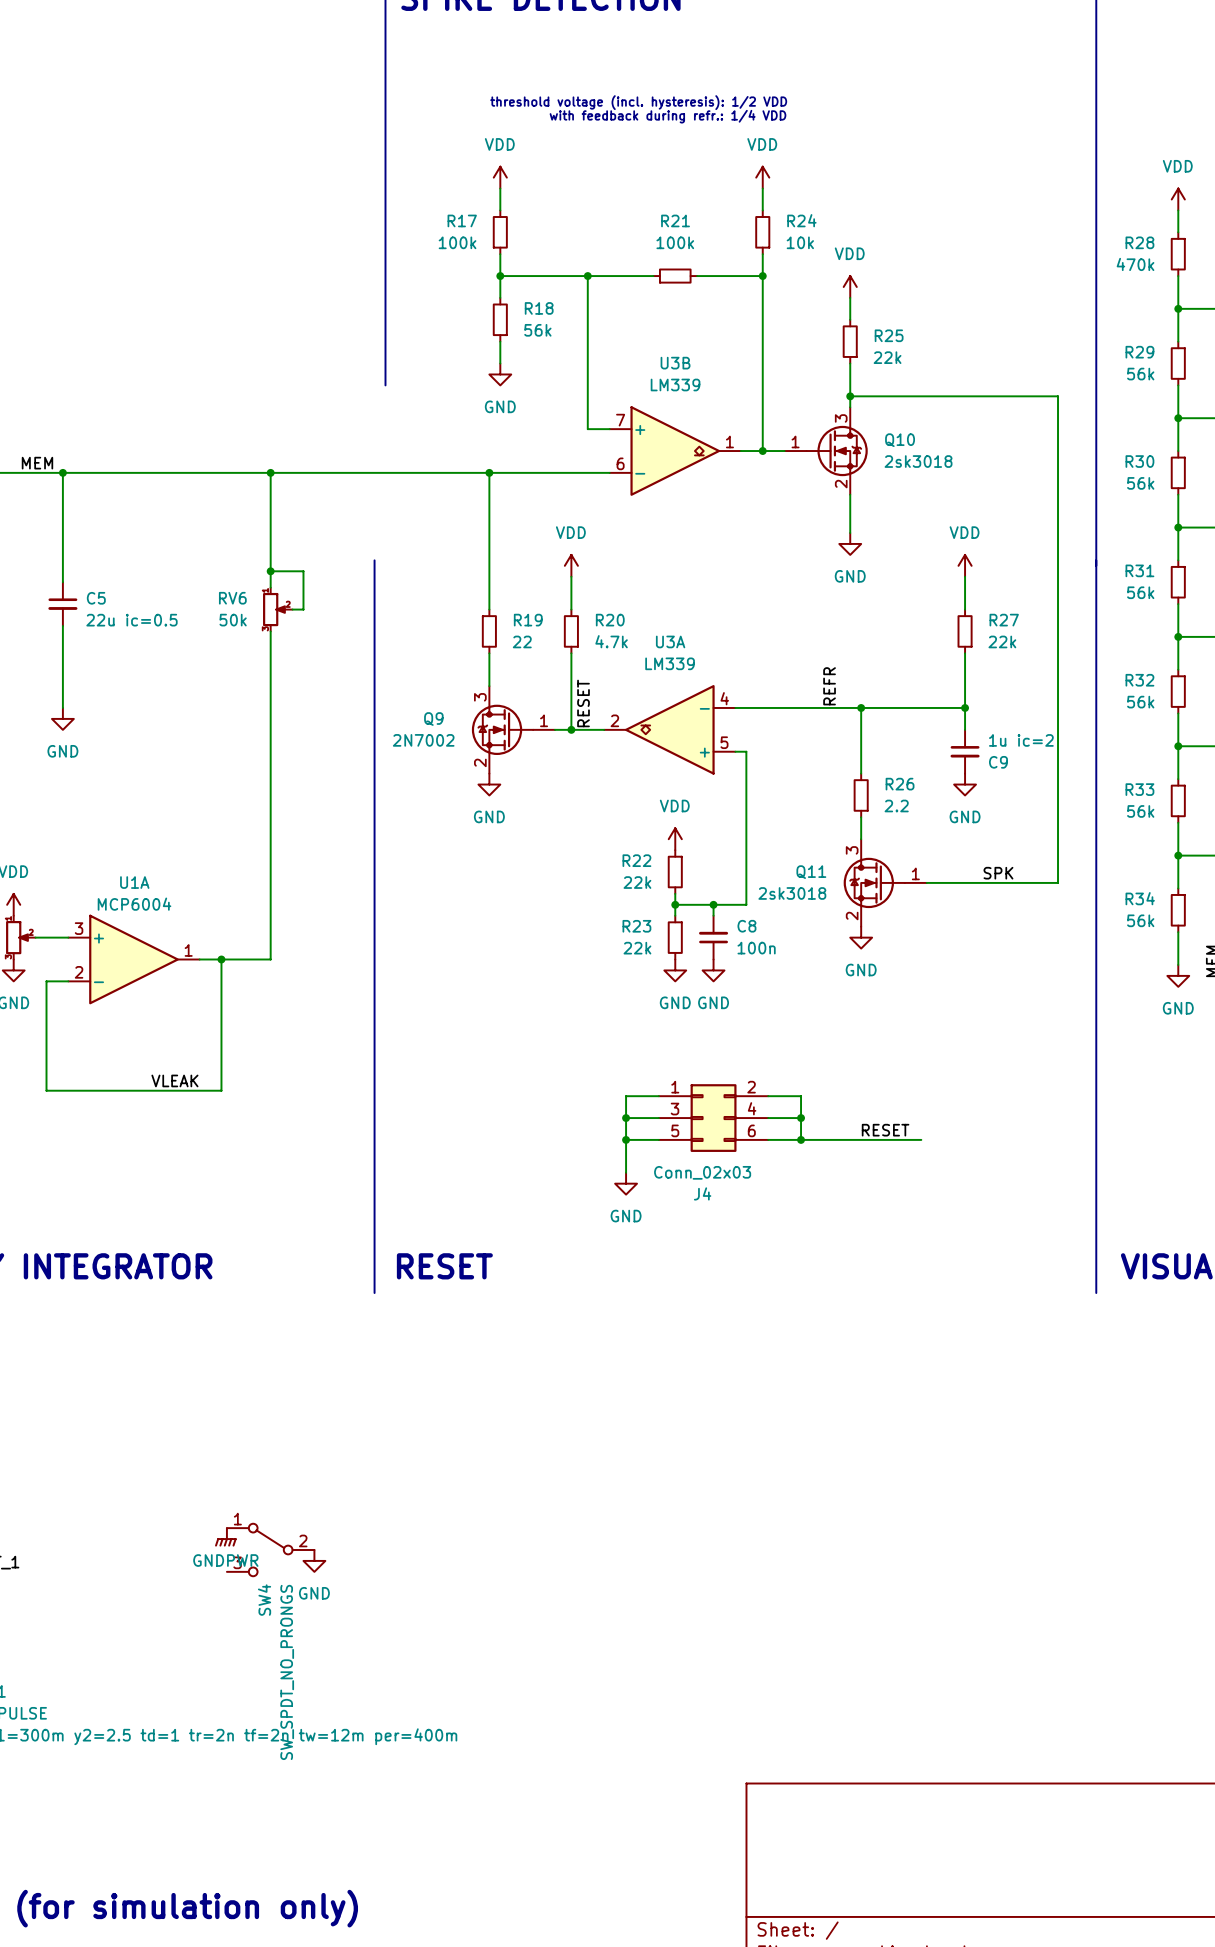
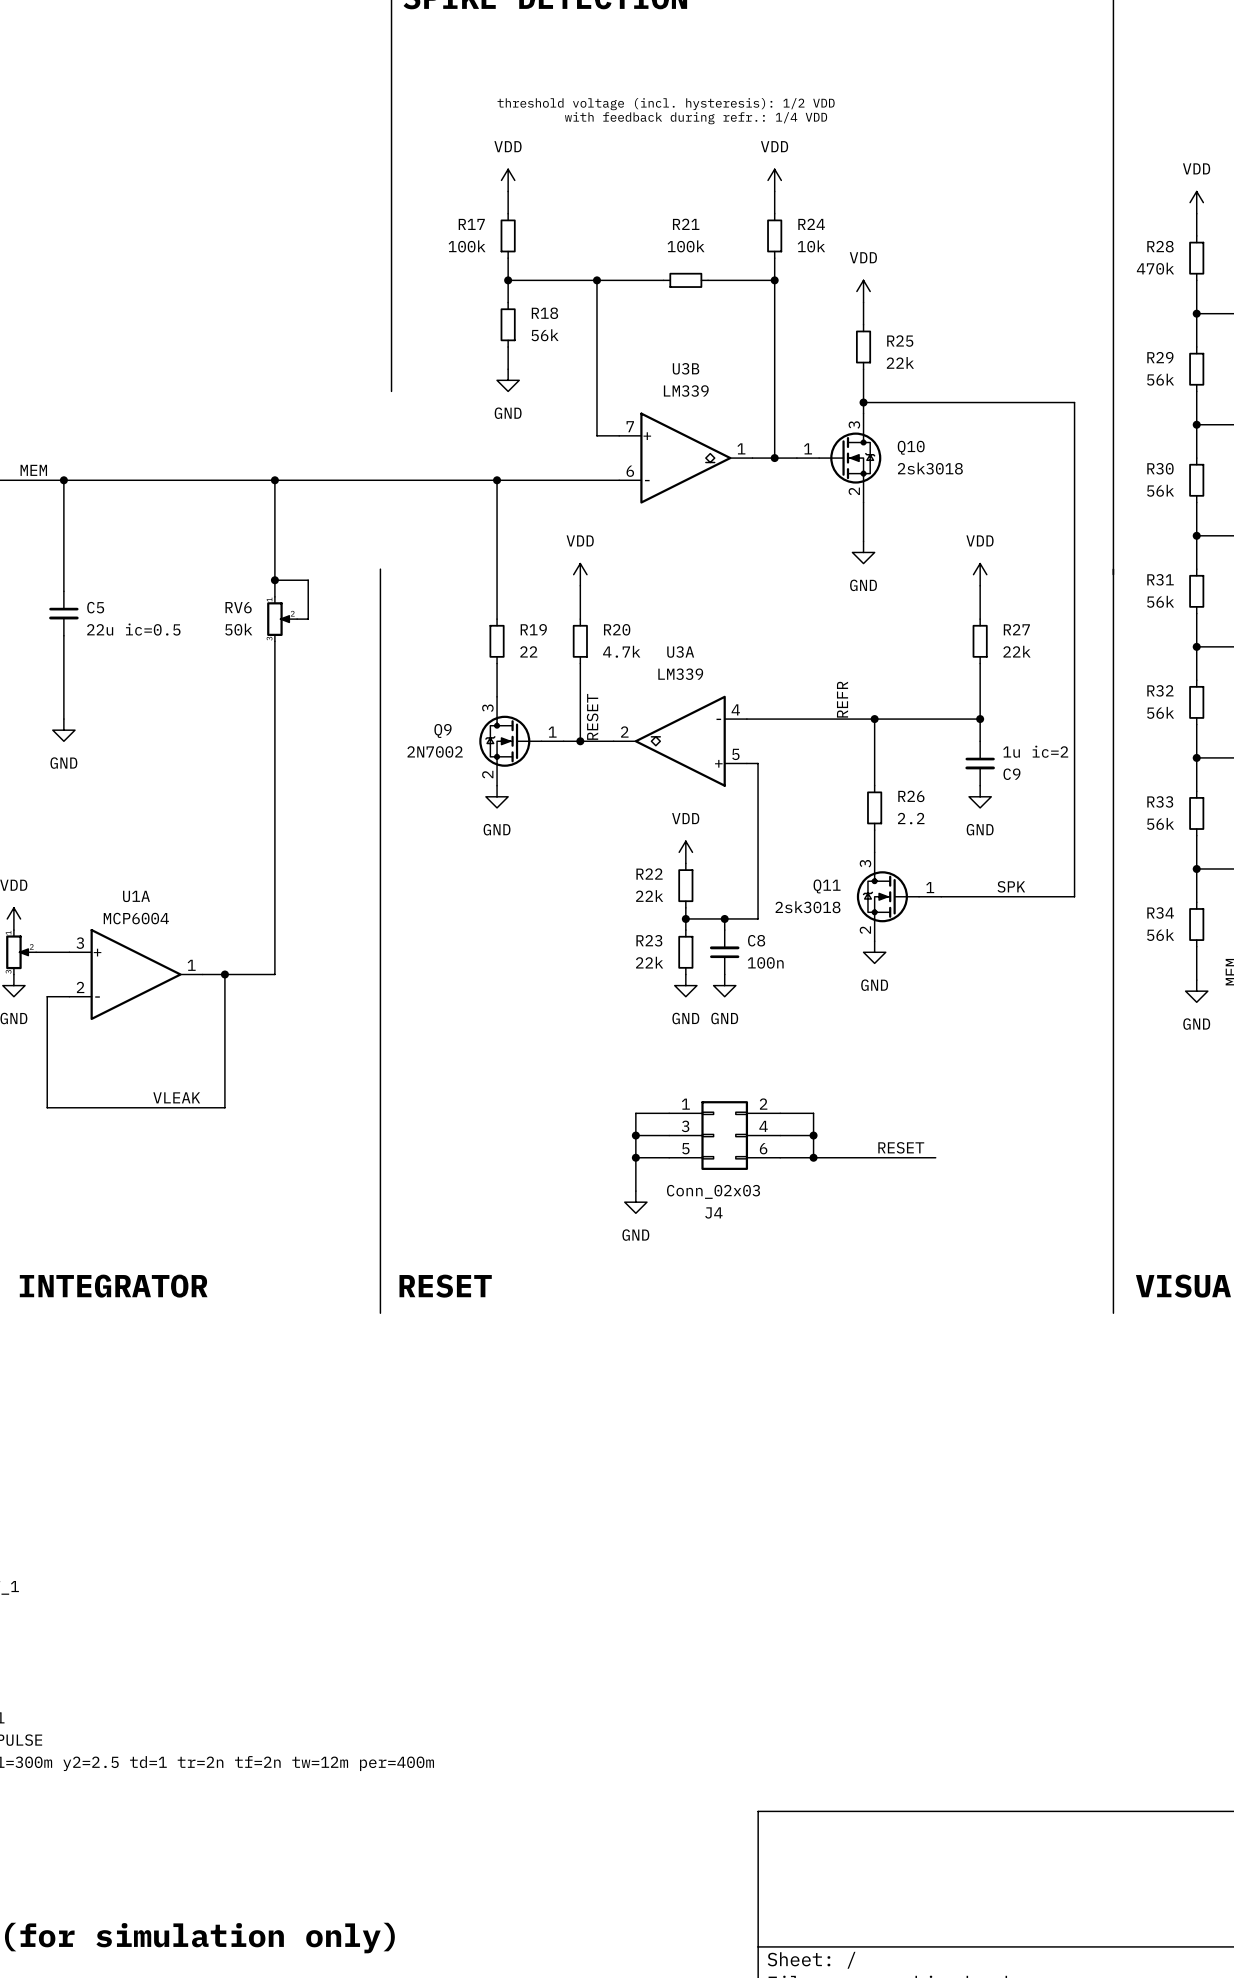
power symbol: GNDPWR (225, 1537) -> none
SW4: SW_SPDT_NO_PRONGS (270, 1549) -> none
power symbol: GND (314, 1560) -> none

